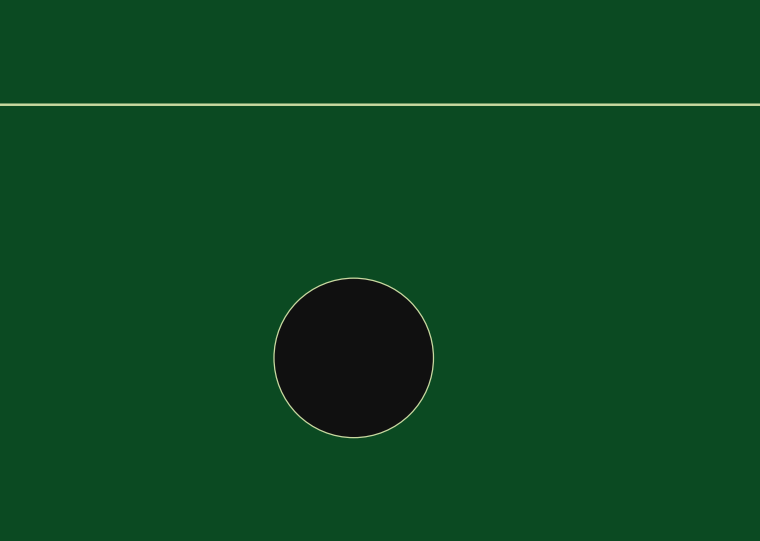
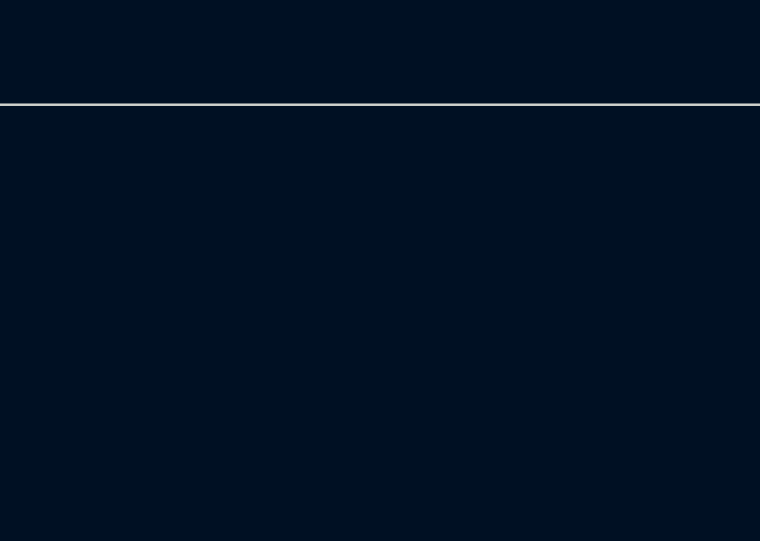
part: (353, 357) -> none

